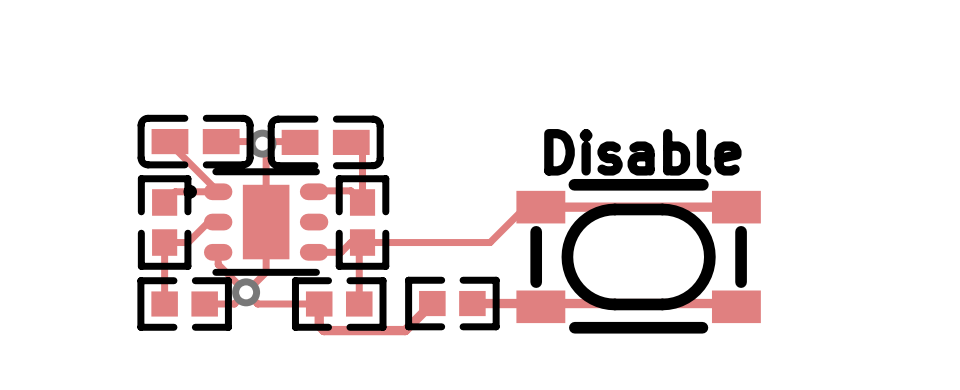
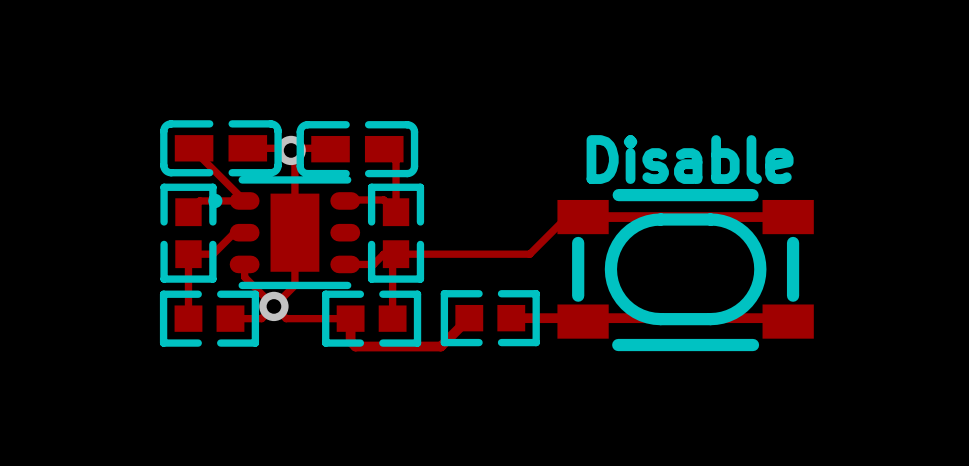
part rotation: 0° (638, 256) -> 180° (685, 270)

